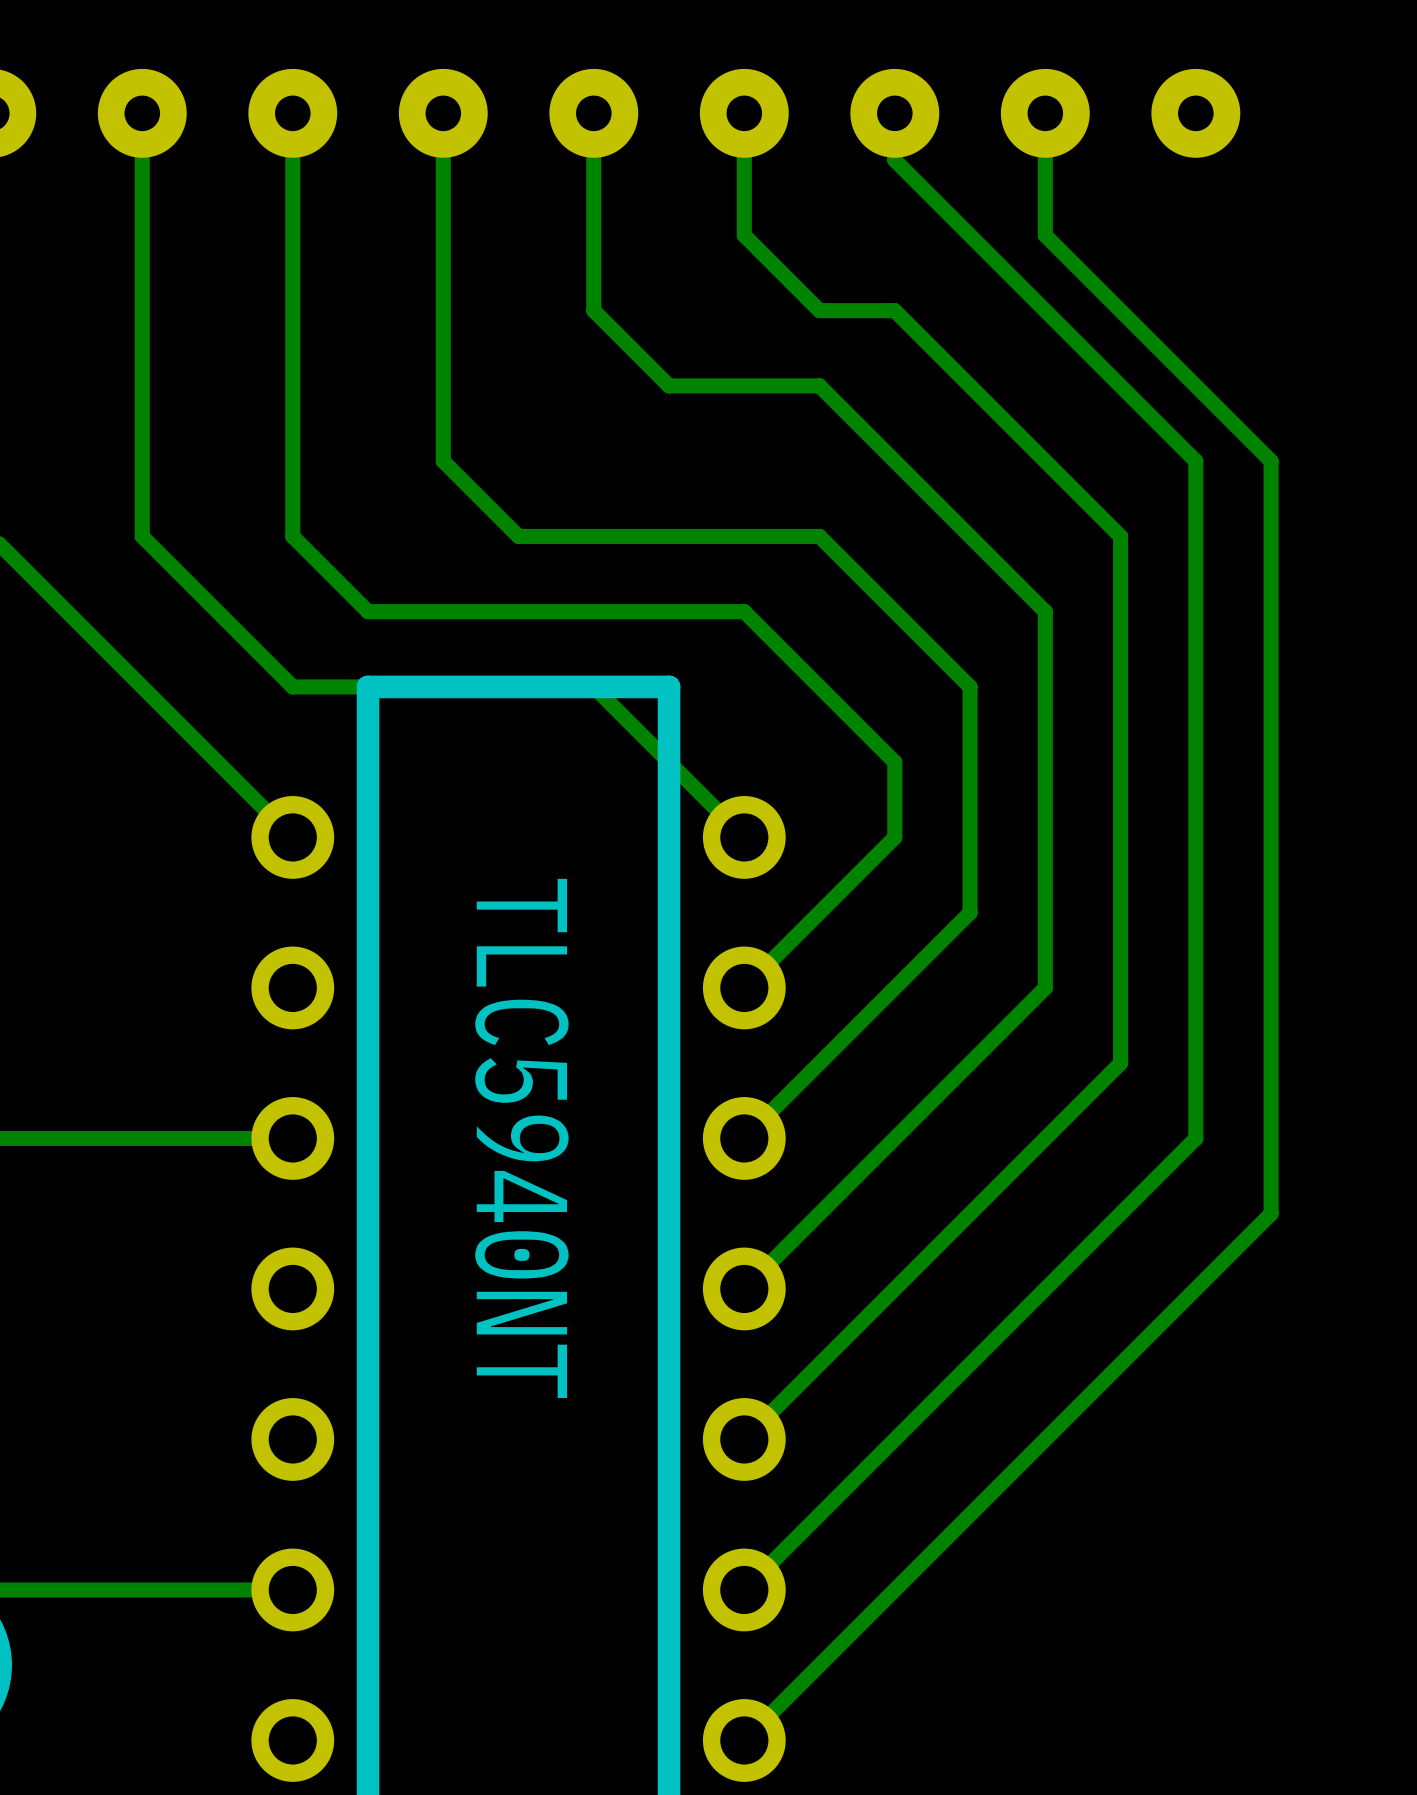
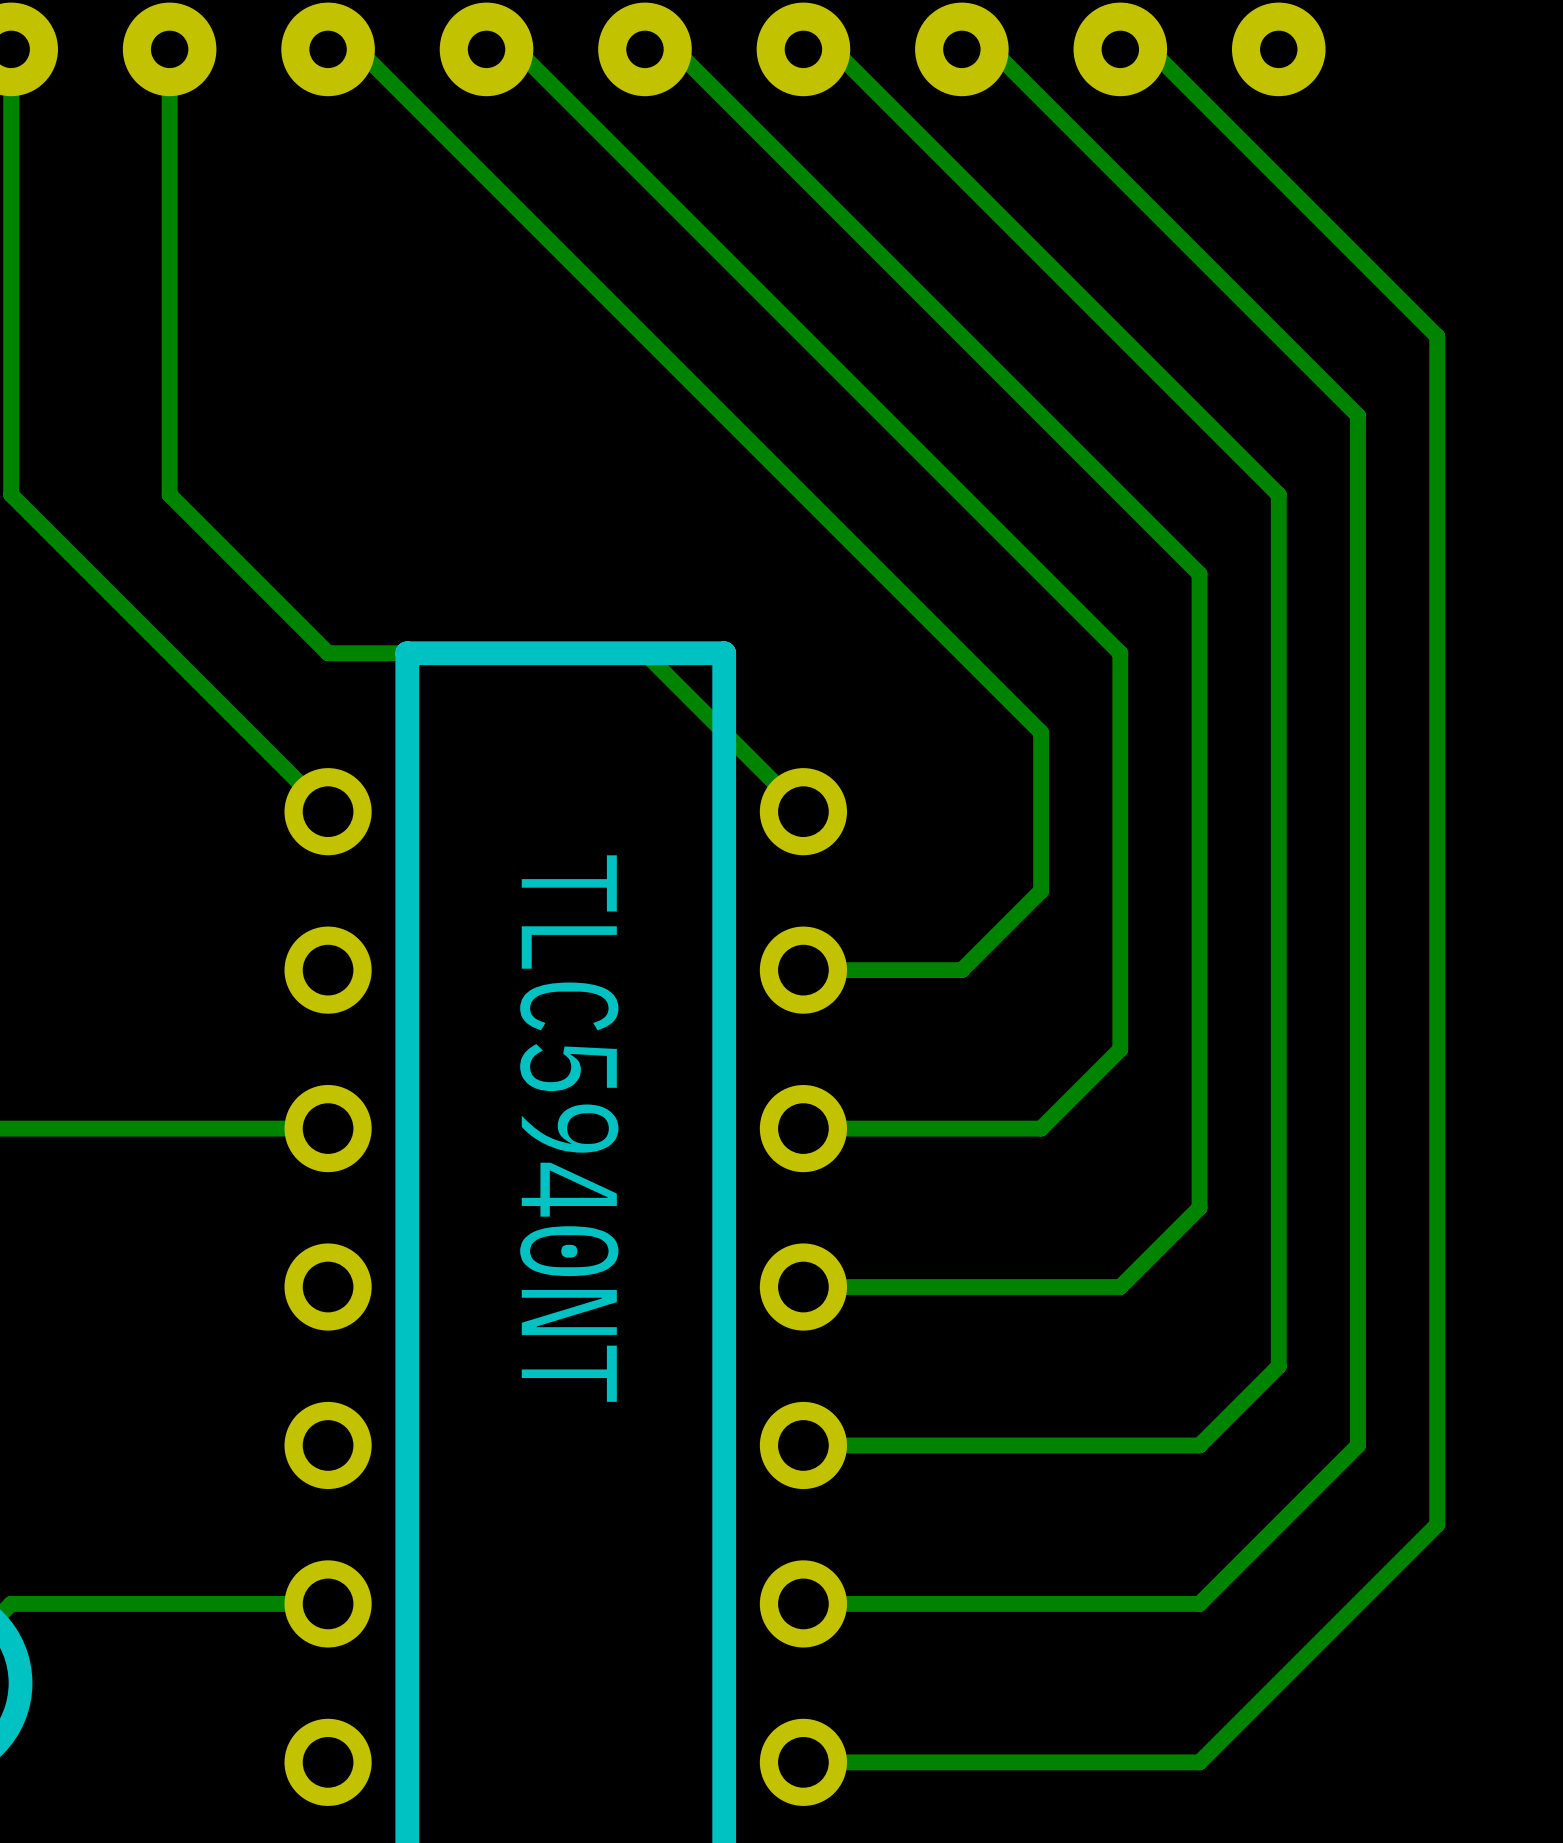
track: (292, 113) (292, 536) (368, 611) (744, 611) (894, 762) (894, 837) (744, 987) -> (328, 49) (358, 49) (1041, 732)
track: (443, 113) (443, 461) (518, 536) (819, 536) (970, 686) (970, 762) -> (486, 49) (516, 49) (1120, 653)
track: (593, 113) (593, 310) (669, 385) (819, 385) (1045, 611) (1045, 686) -> none
track: (744, 113) (744, 235) -> (644, 49) (674, 49) (803, 177)
track: (894, 113) (894, 160) (1195, 461) (1195, 536) -> (803, 49) (833, 49) (1278, 494)
track: (1045, 113) (1045, 235) -> (961, 49) (991, 49) (1120, 177)
track: none -> (1120, 49) (1150, 49) (1437, 336) (1437, 1524) (1199, 1762) (803, 1762)
track: (819, 310) (894, 310) (1120, 536) (1120, 611) -> (882, 257) (1199, 574)
track: (894, 987) (744, 1138) -> (961, 970) (803, 970)
track: (1045, 987) (744, 1288) -> (1120, 970) (1120, 1049) (1041, 1128) (803, 1128)
track: (1120, 1063) (744, 1439) -> (1278, 1128) (1278, 1366) (1199, 1445) (803, 1445)
track: (1195, 1138) (1120, 1213) -> (1199, 1049) (1199, 1207)
track: (1271, 1213) (744, 1740) -> (1357, 1207) (1357, 1445) (1199, 1603) (803, 1603)
track: (1045, 1288) (744, 1589) -> (1120, 1287) (803, 1287)

